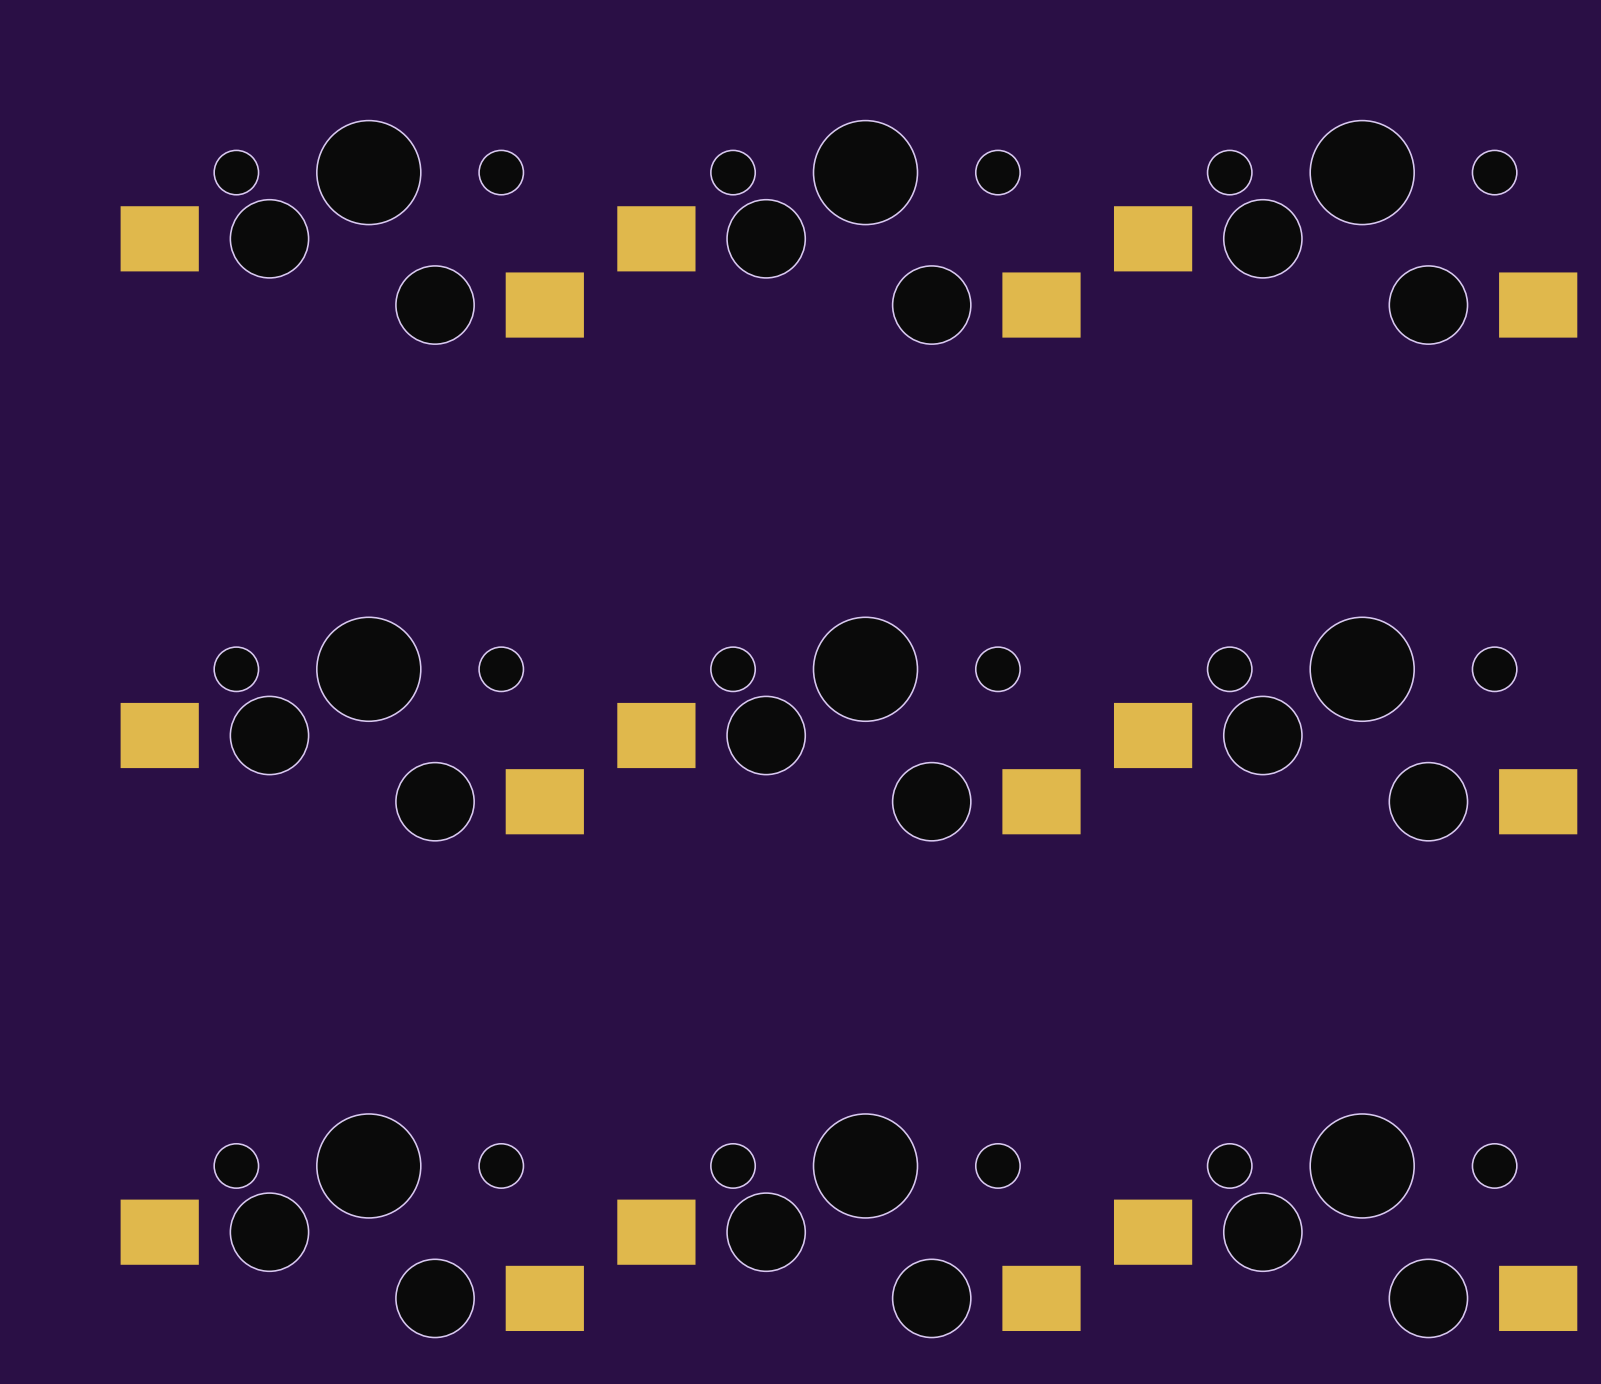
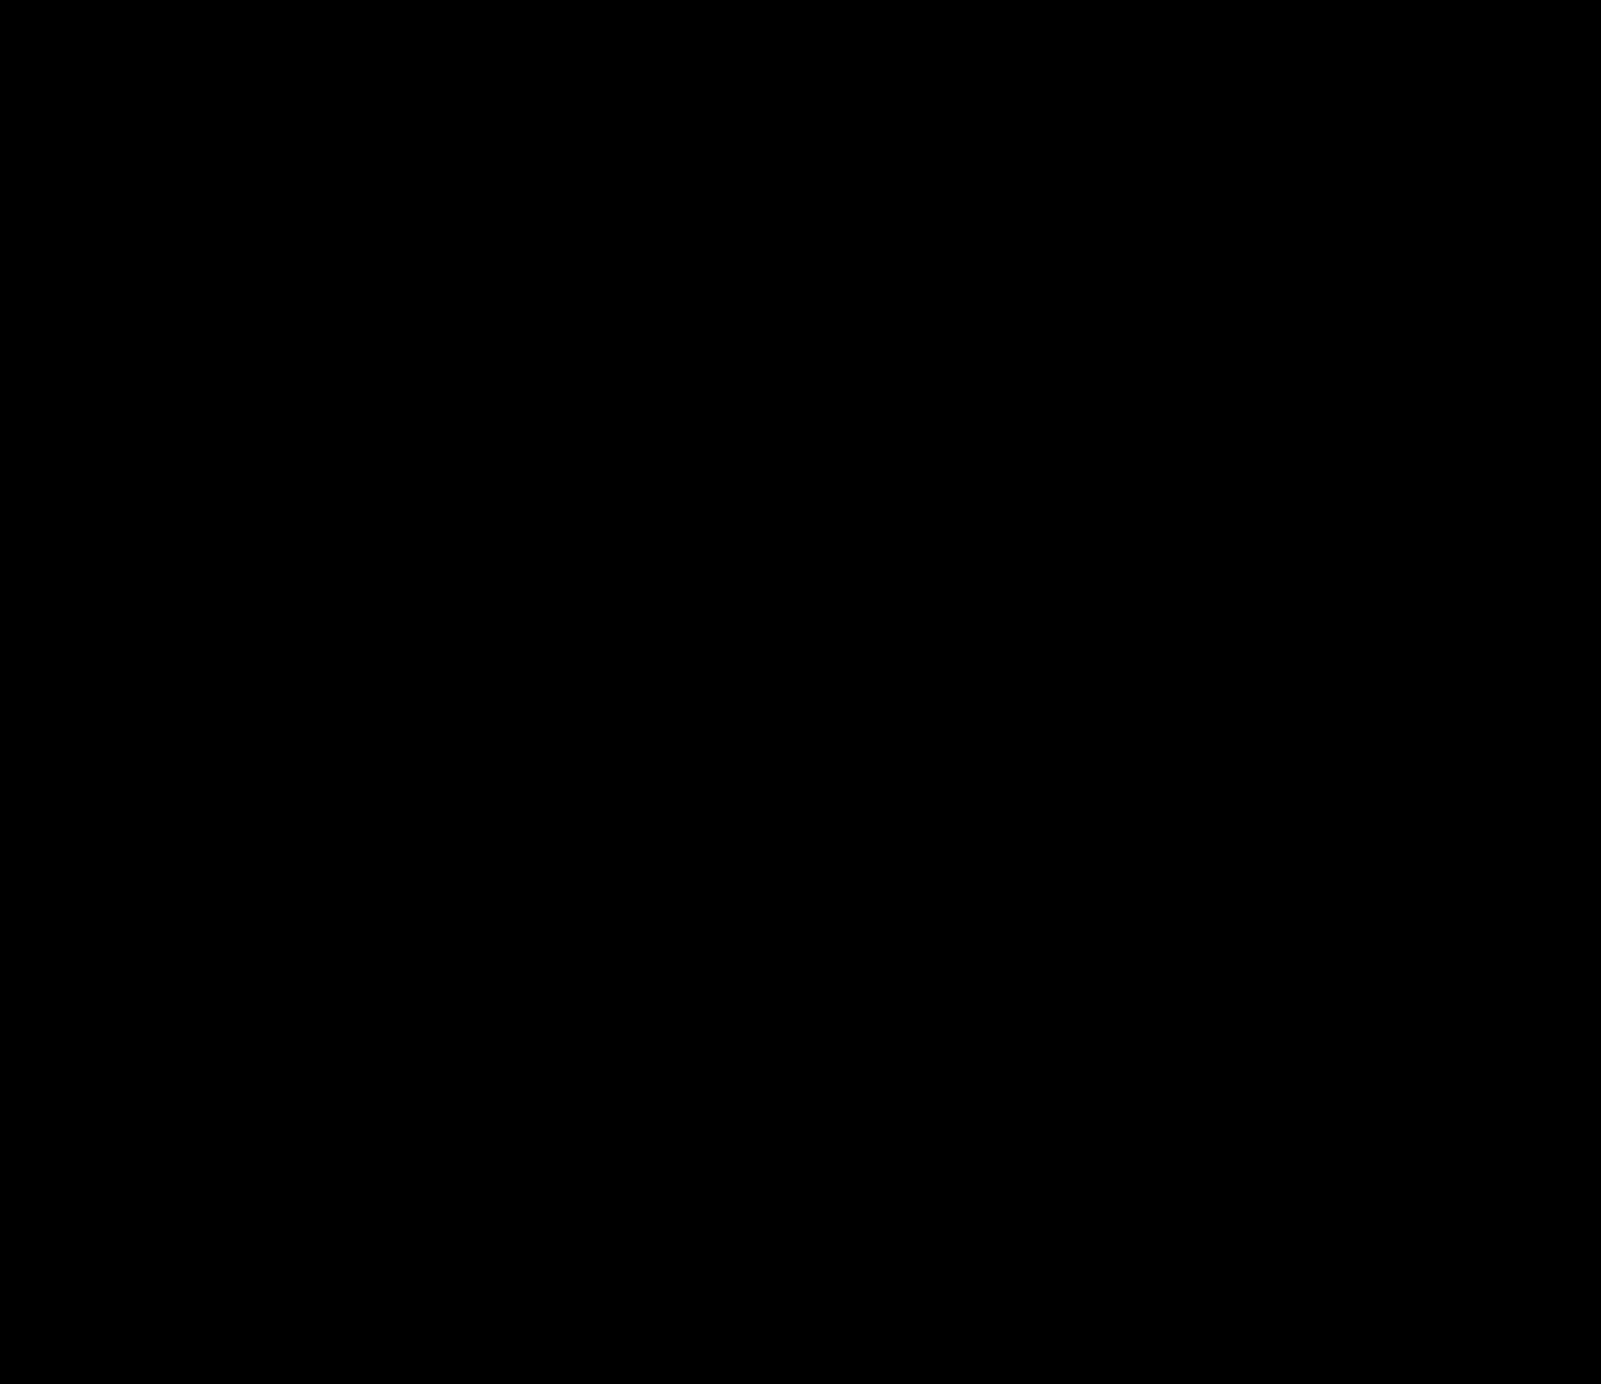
part: (352, 232) -> none
part: (848, 232) -> none
part: (1345, 232) -> none
part: (352, 729) -> none
part: (848, 729) -> none
part: (1345, 729) -> none
part: (352, 1225) -> none
part: (848, 1225) -> none
part: (1345, 1225) -> none

